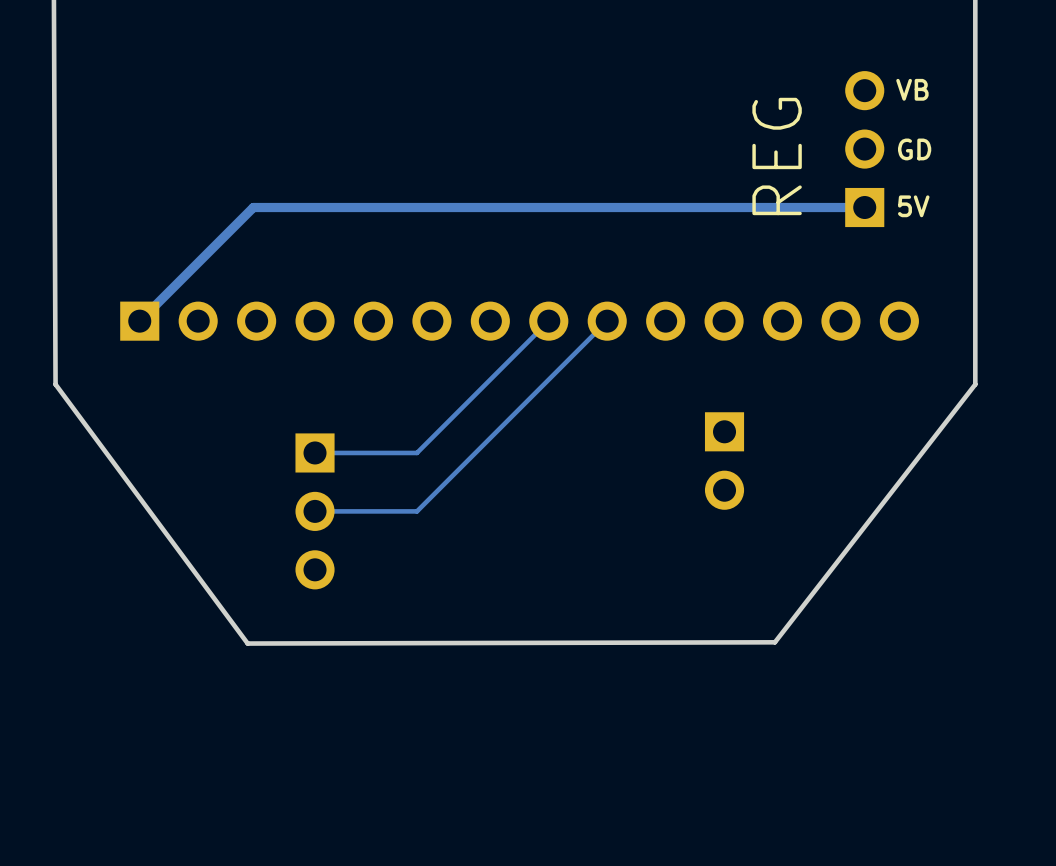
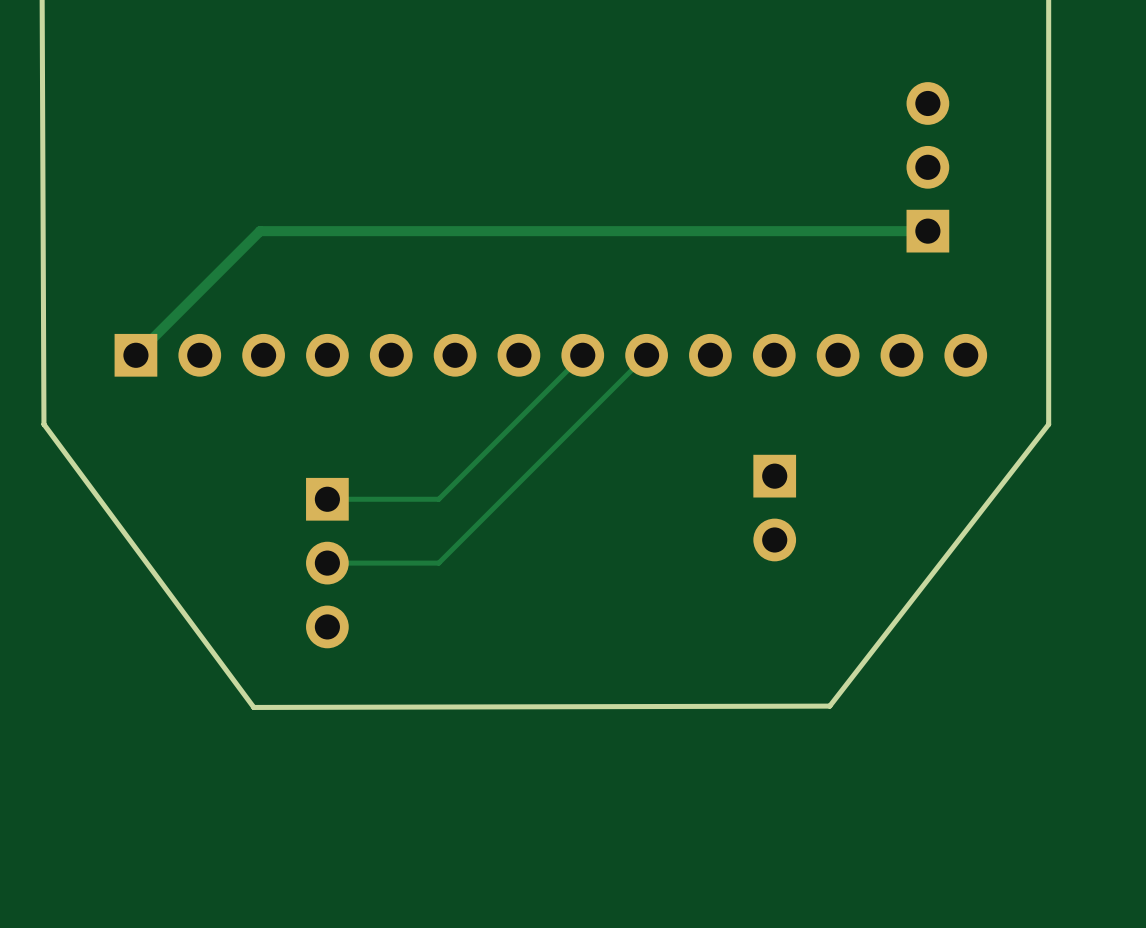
text: VB (912, 89) -> none
text: GD (914, 149) -> none
text: REG (777, 156) -> none
text: 5V (913, 206) -> none

